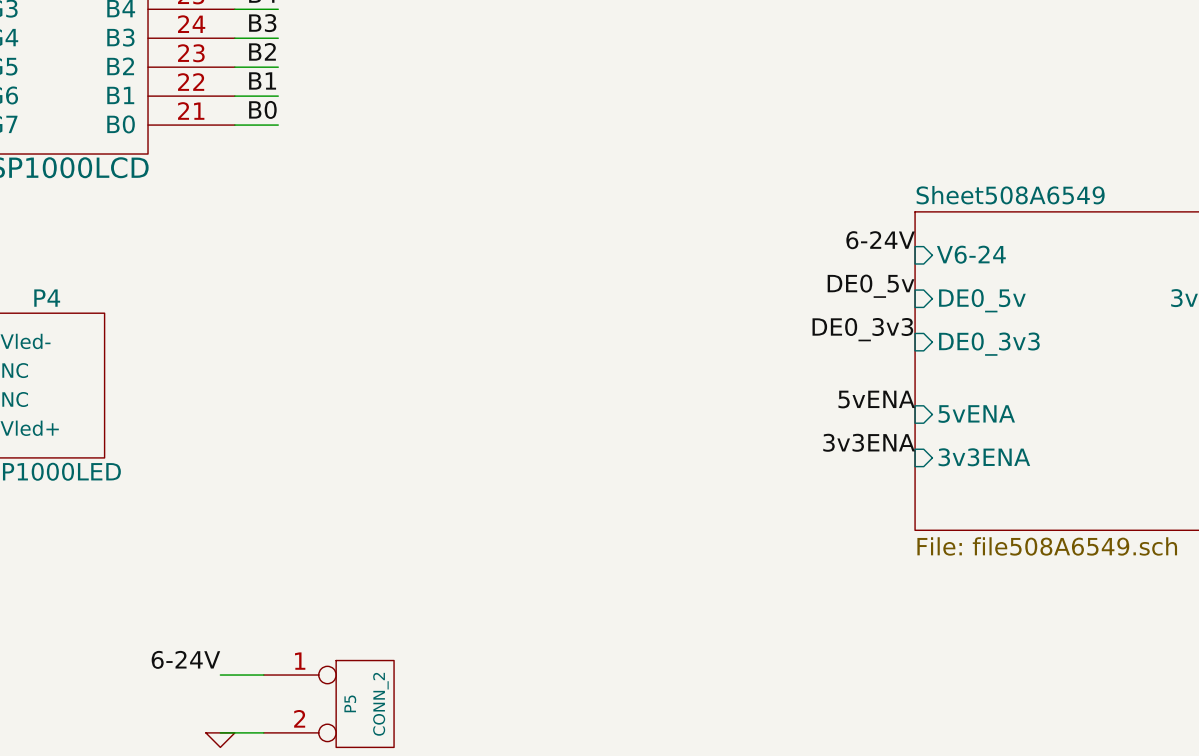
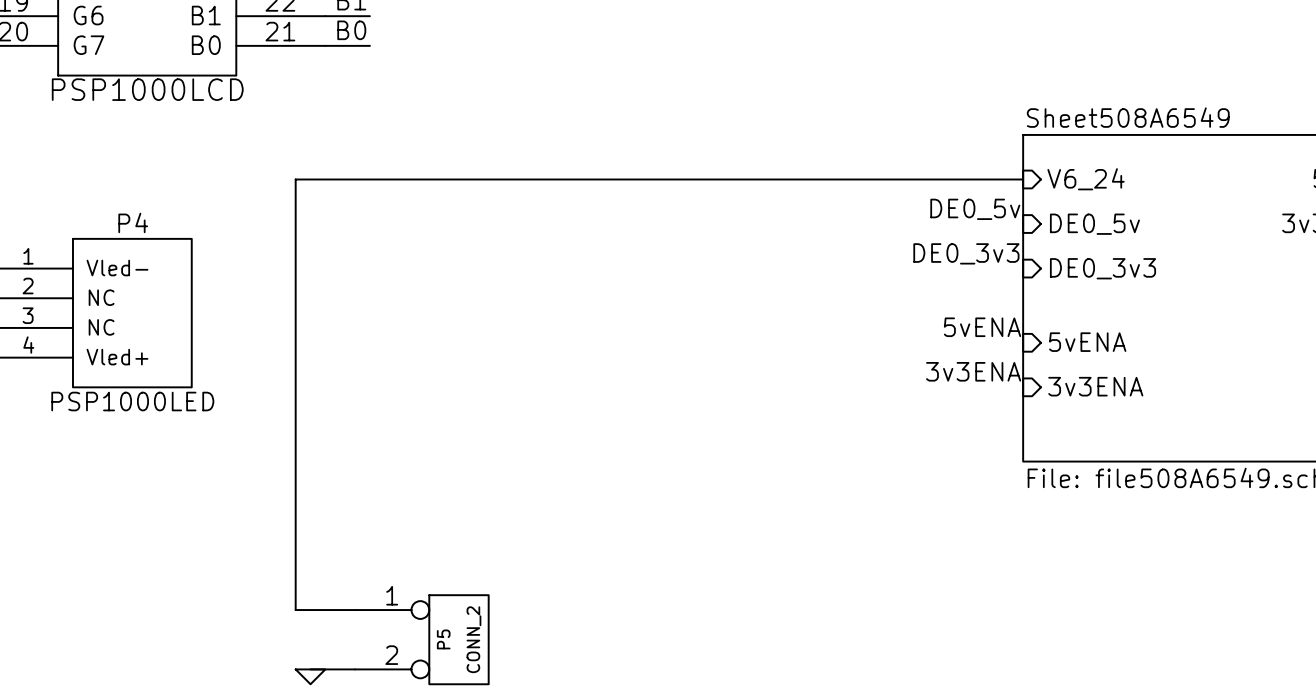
label: 6-24V (880, 240) -> none
sheet pin: V6-24 (971, 254) -> V6_24 (1086, 179)
wire: none -> (1023, 179) (295, 179) (295, 610) (310, 610)
label: 6-24V (185, 659) -> none

